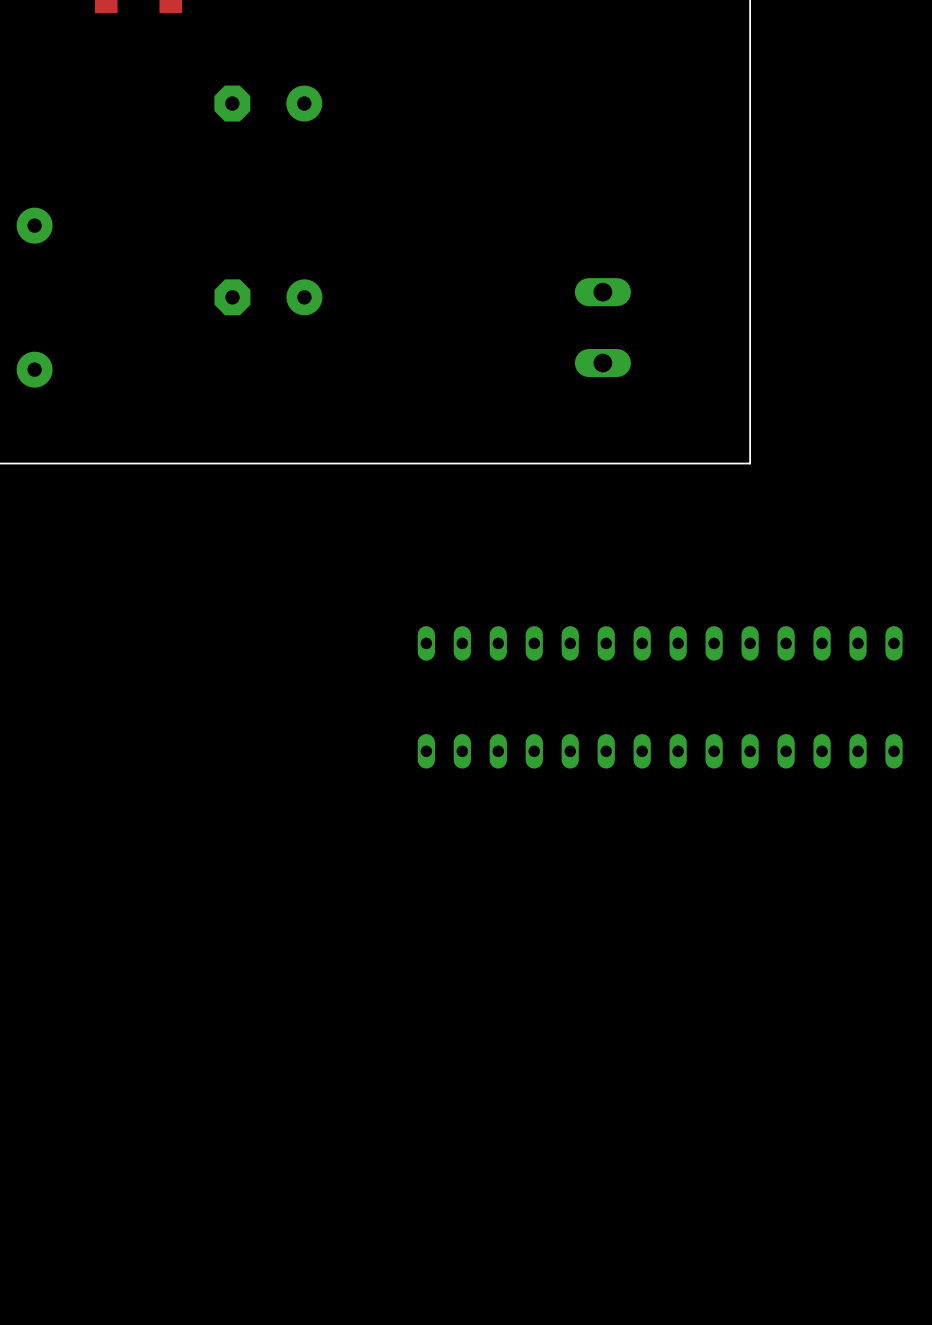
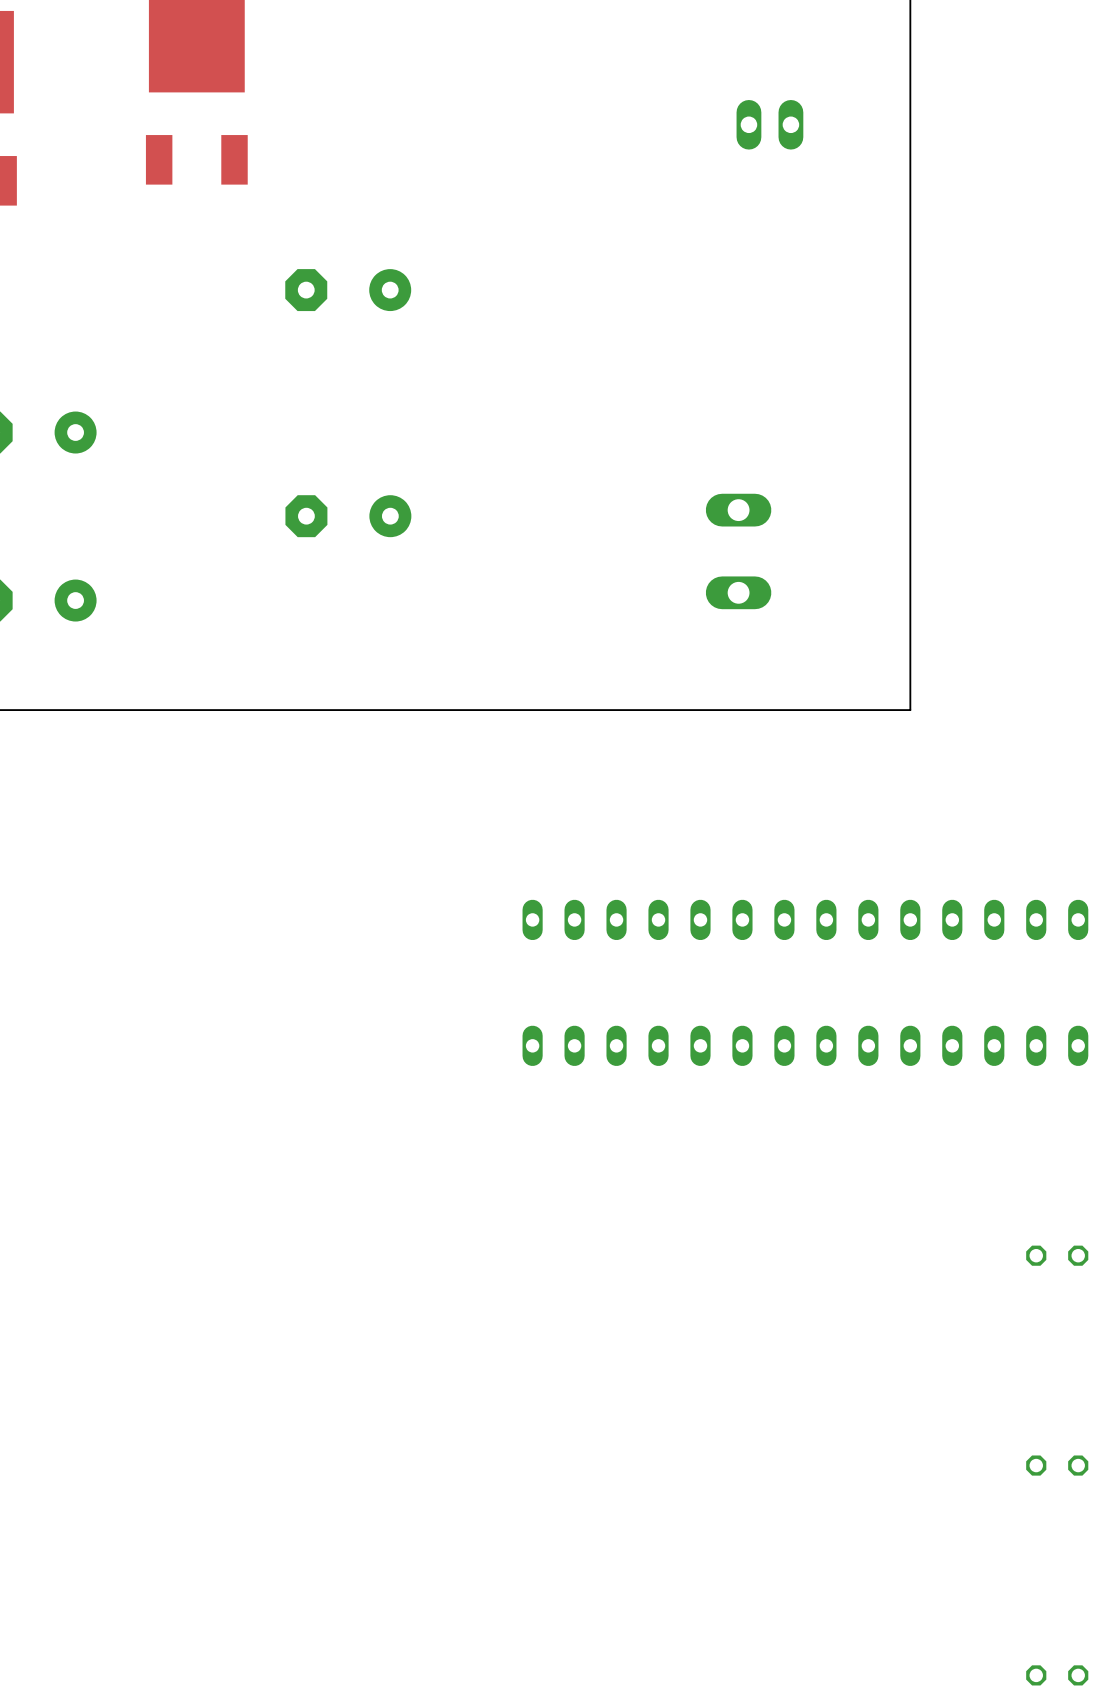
part: none -> (1057, 1255)
part: none -> (1057, 1465)
part: none -> (1057, 1675)

